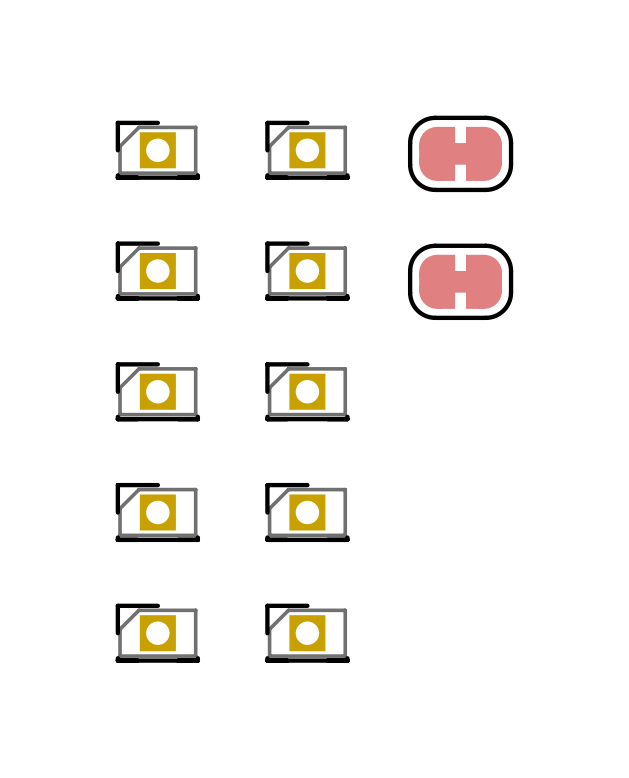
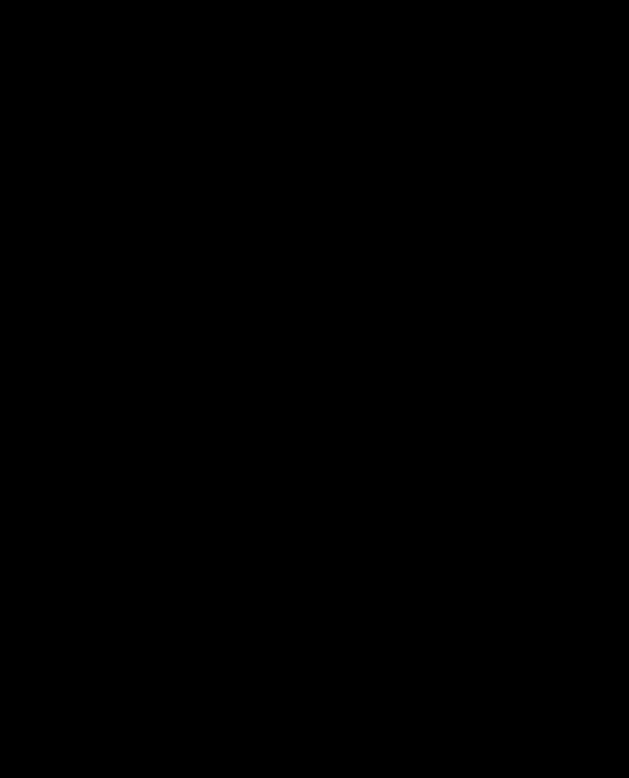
part: (157, 150) -> none
part: (307, 150) -> none
part: (460, 153) -> none
part: (157, 271) -> none
part: (307, 271) -> none
part: (460, 281) -> none
part: (157, 391) -> none
part: (307, 391) -> none
part: (157, 512) -> none
part: (307, 512) -> none
part: (157, 633) -> none
part: (307, 633) -> none

